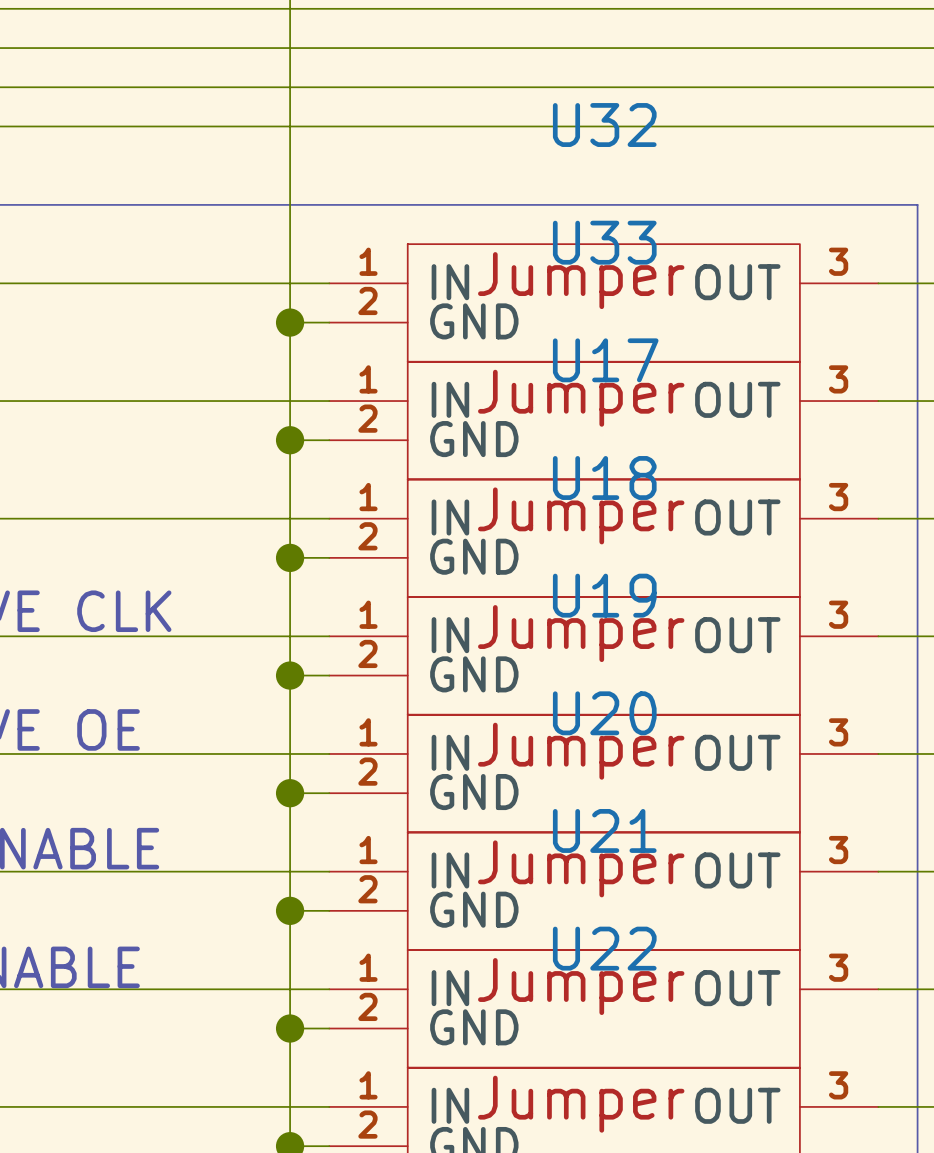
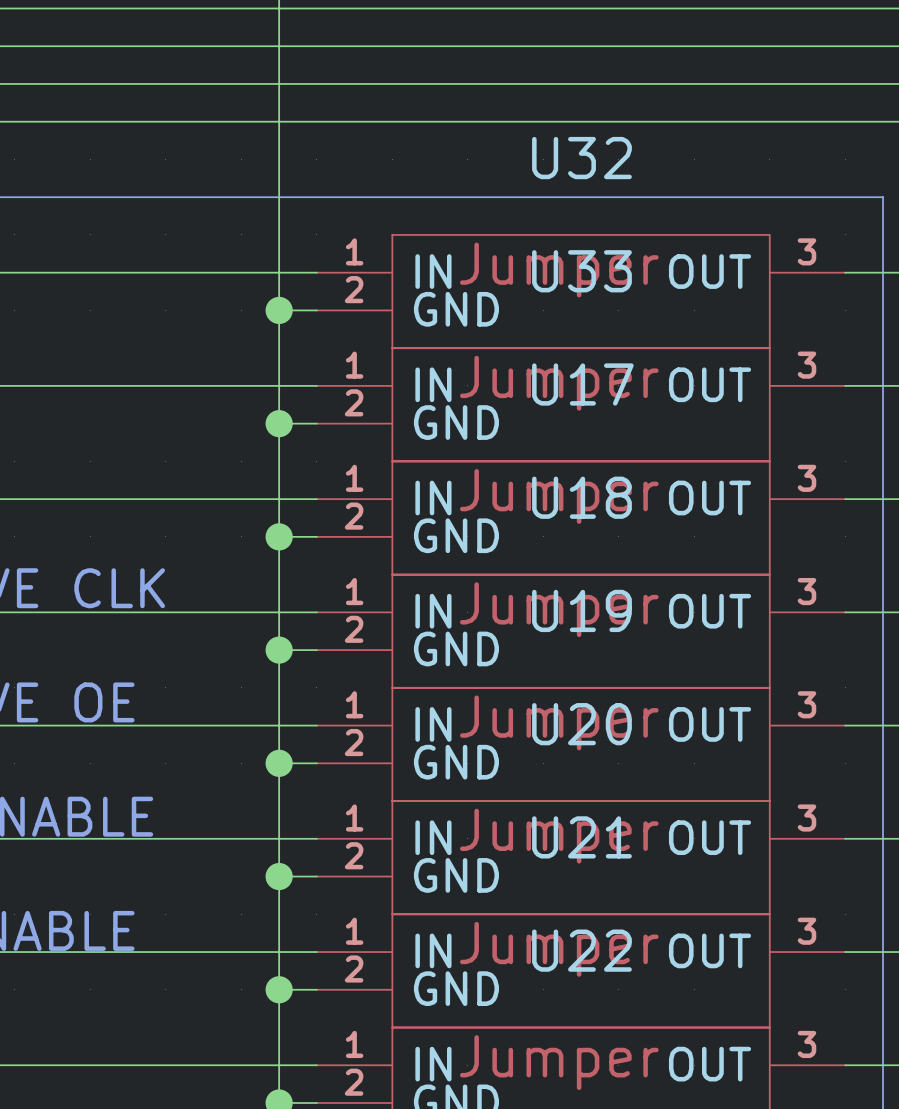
U32 name position: U32 (604, 125) -> U32 (581, 158)
U33 name position: U33 (604, 242) -> U33 (581, 271)
U17 name position: U17 (605, 360) -> U17 (582, 384)
U18 name position: U18 (604, 477) -> U18 (581, 497)
U19 name position: U19 (604, 595) -> U19 (581, 610)
U20 name position: U20 (604, 713) -> U20 (581, 724)
U21 name position: U21 (604, 830) -> U21 (581, 837)
U22 name position: U22 (604, 948) -> U22 (581, 950)

